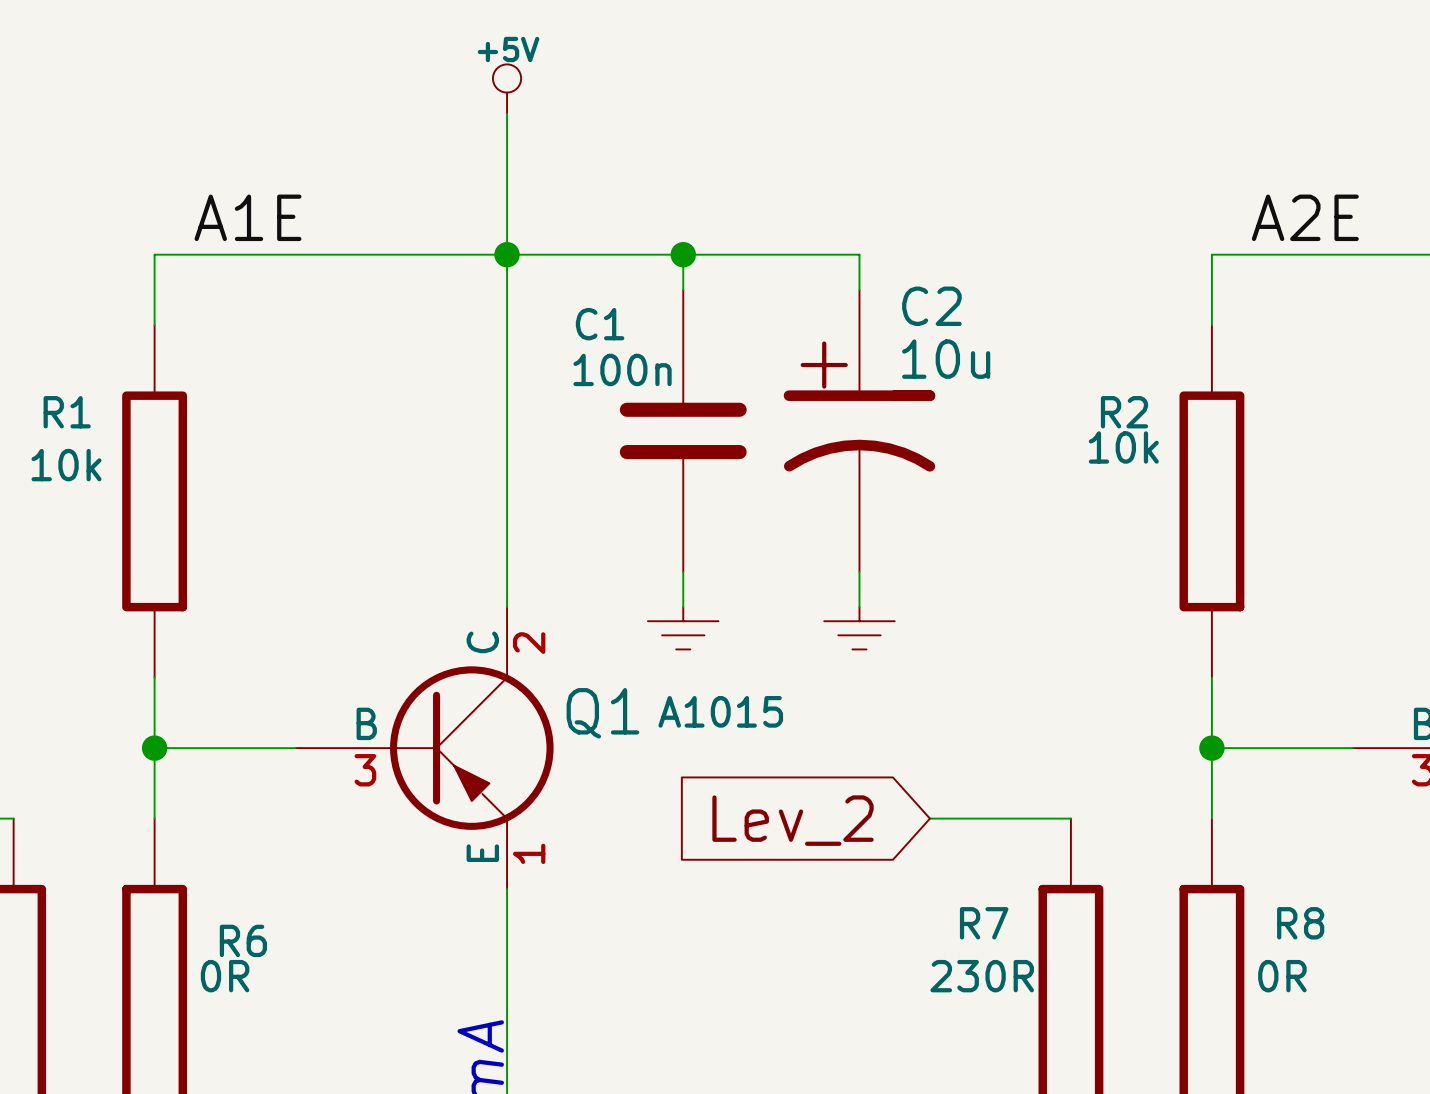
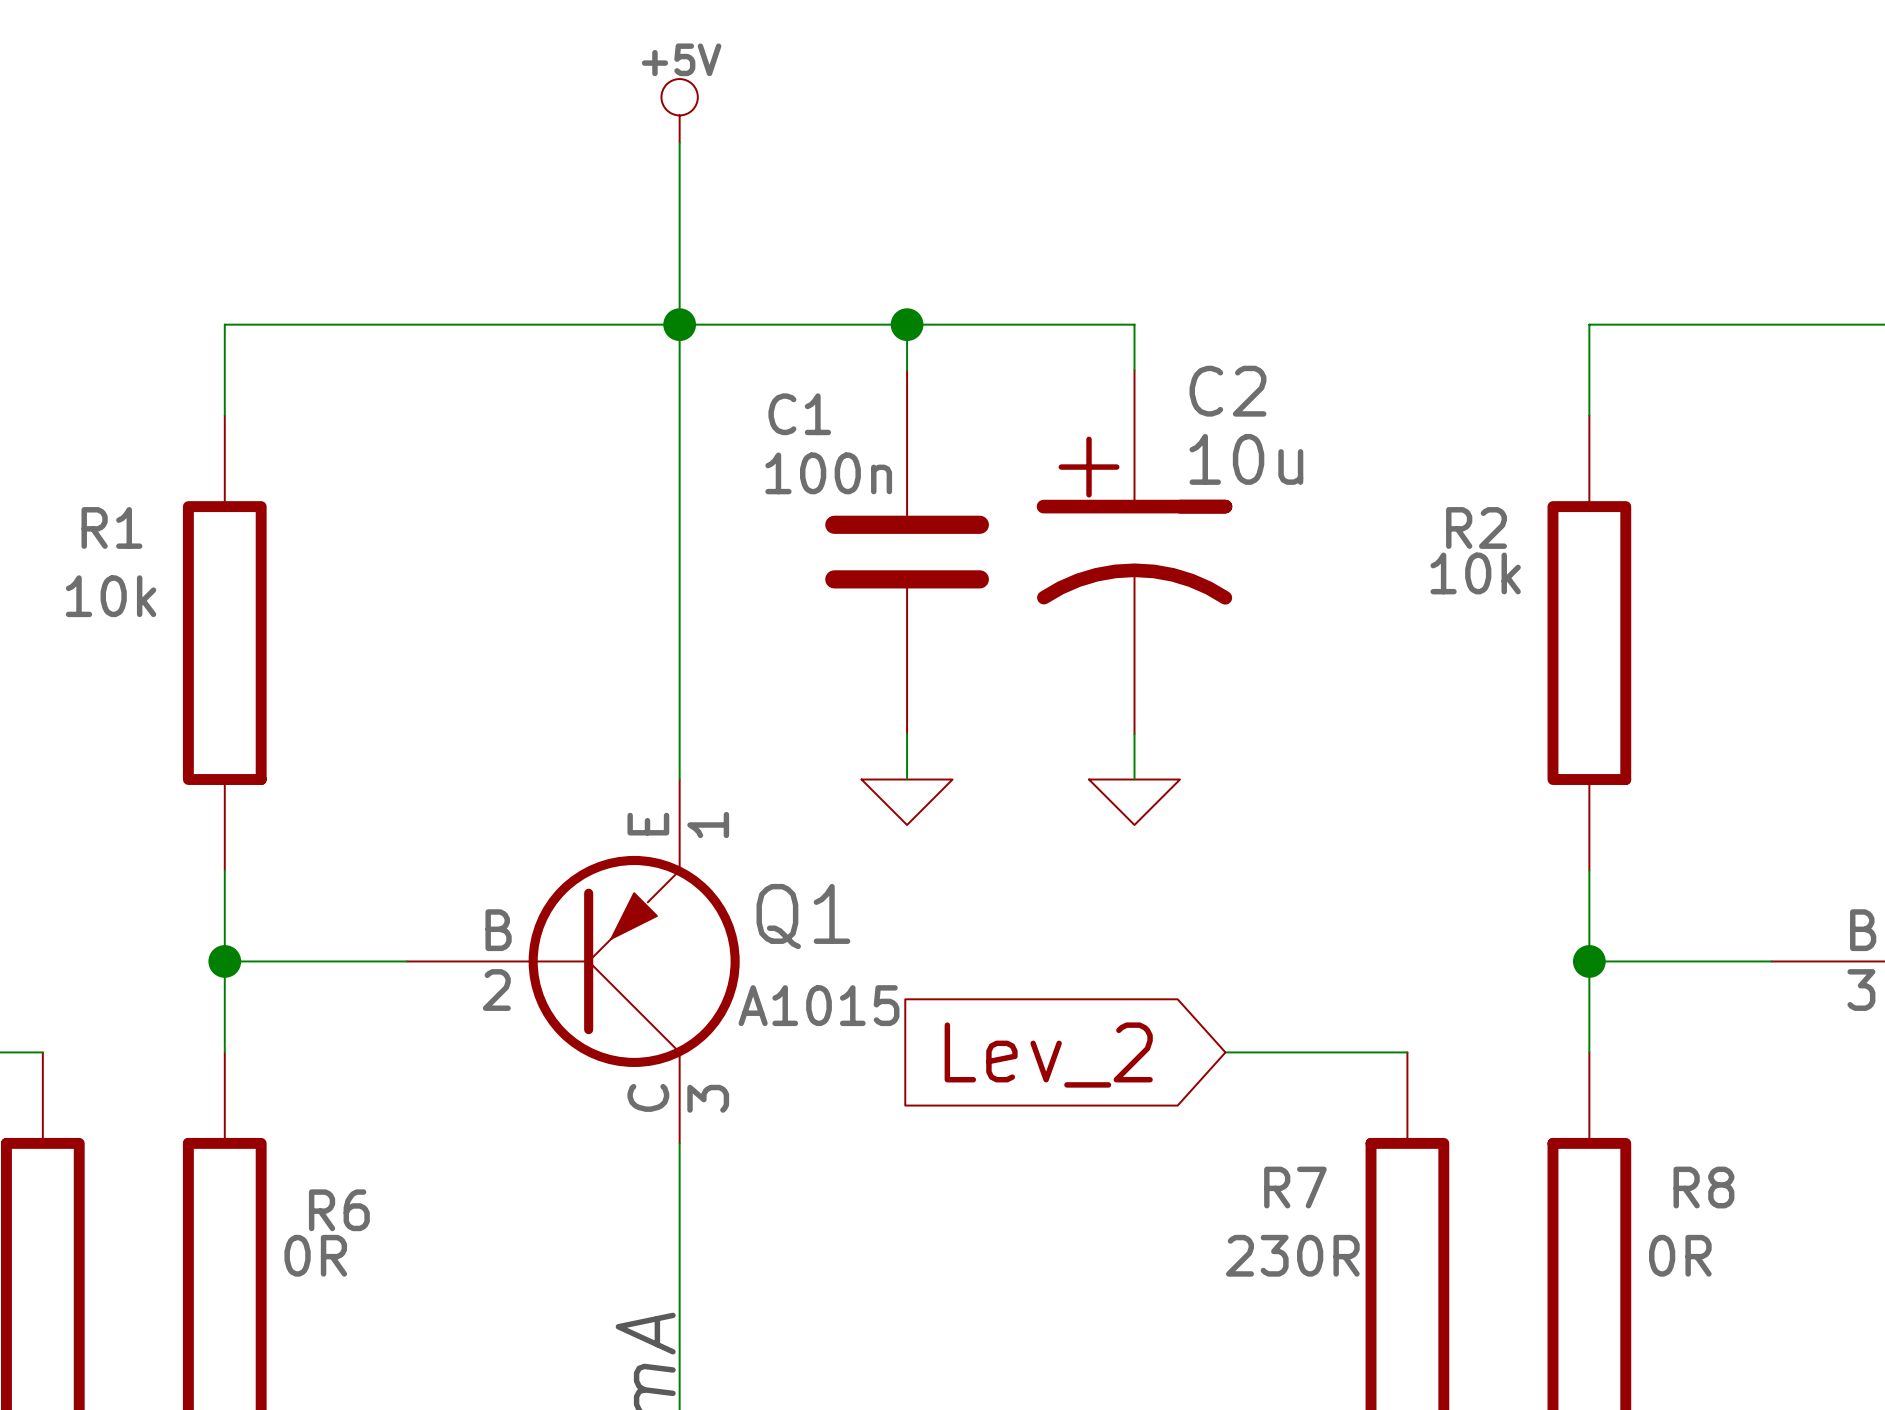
label: A1E (248, 217) -> none
label: A2E (1305, 217) -> none
Q1 symbol: [295, 607, 554, 890] -> [406, 779, 740, 1144]
power symbol shape: [648, 607, 719, 650] -> [861, 779, 953, 826]
power symbol shape: [824, 607, 895, 650] -> [1089, 779, 1180, 826]
Q1 value position: A1015 (720, 711) -> A1015 (819, 1005)

